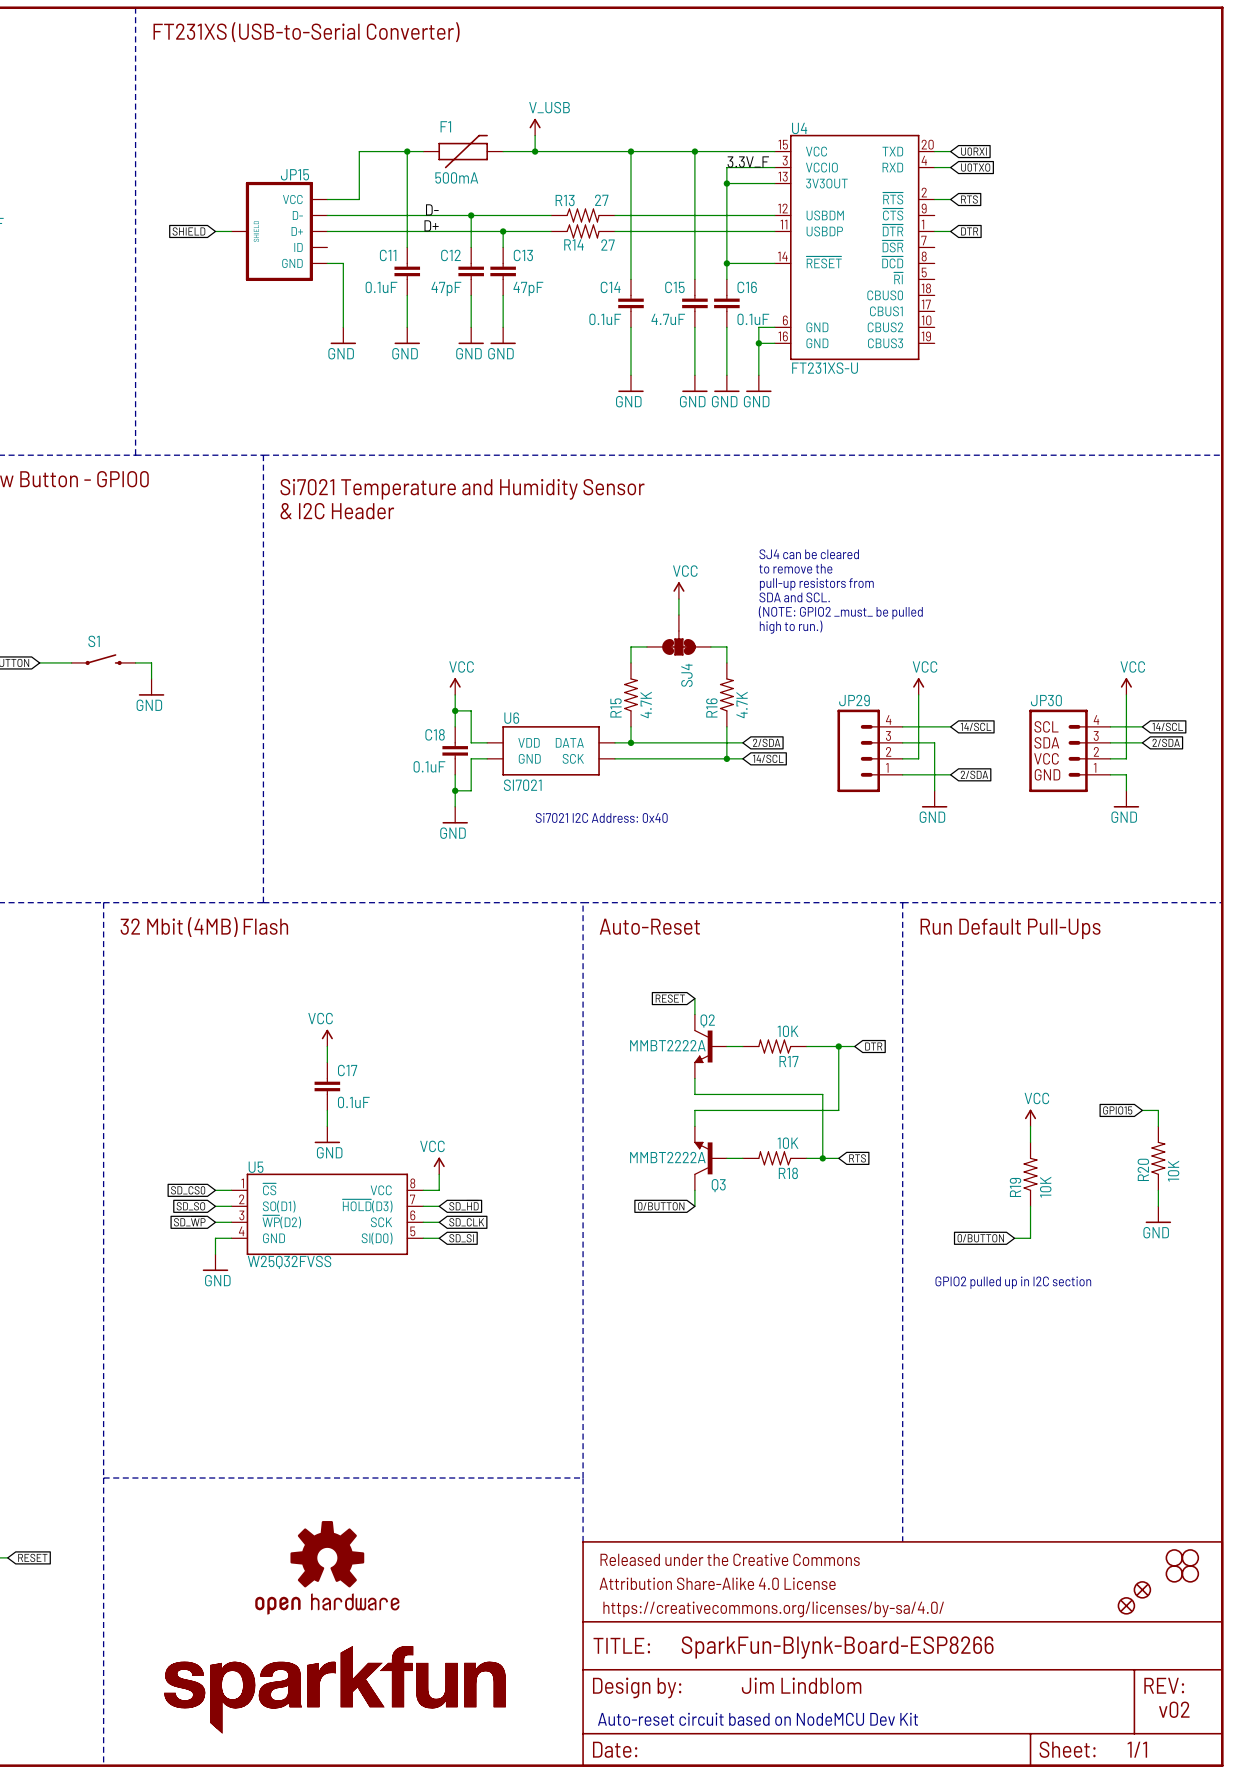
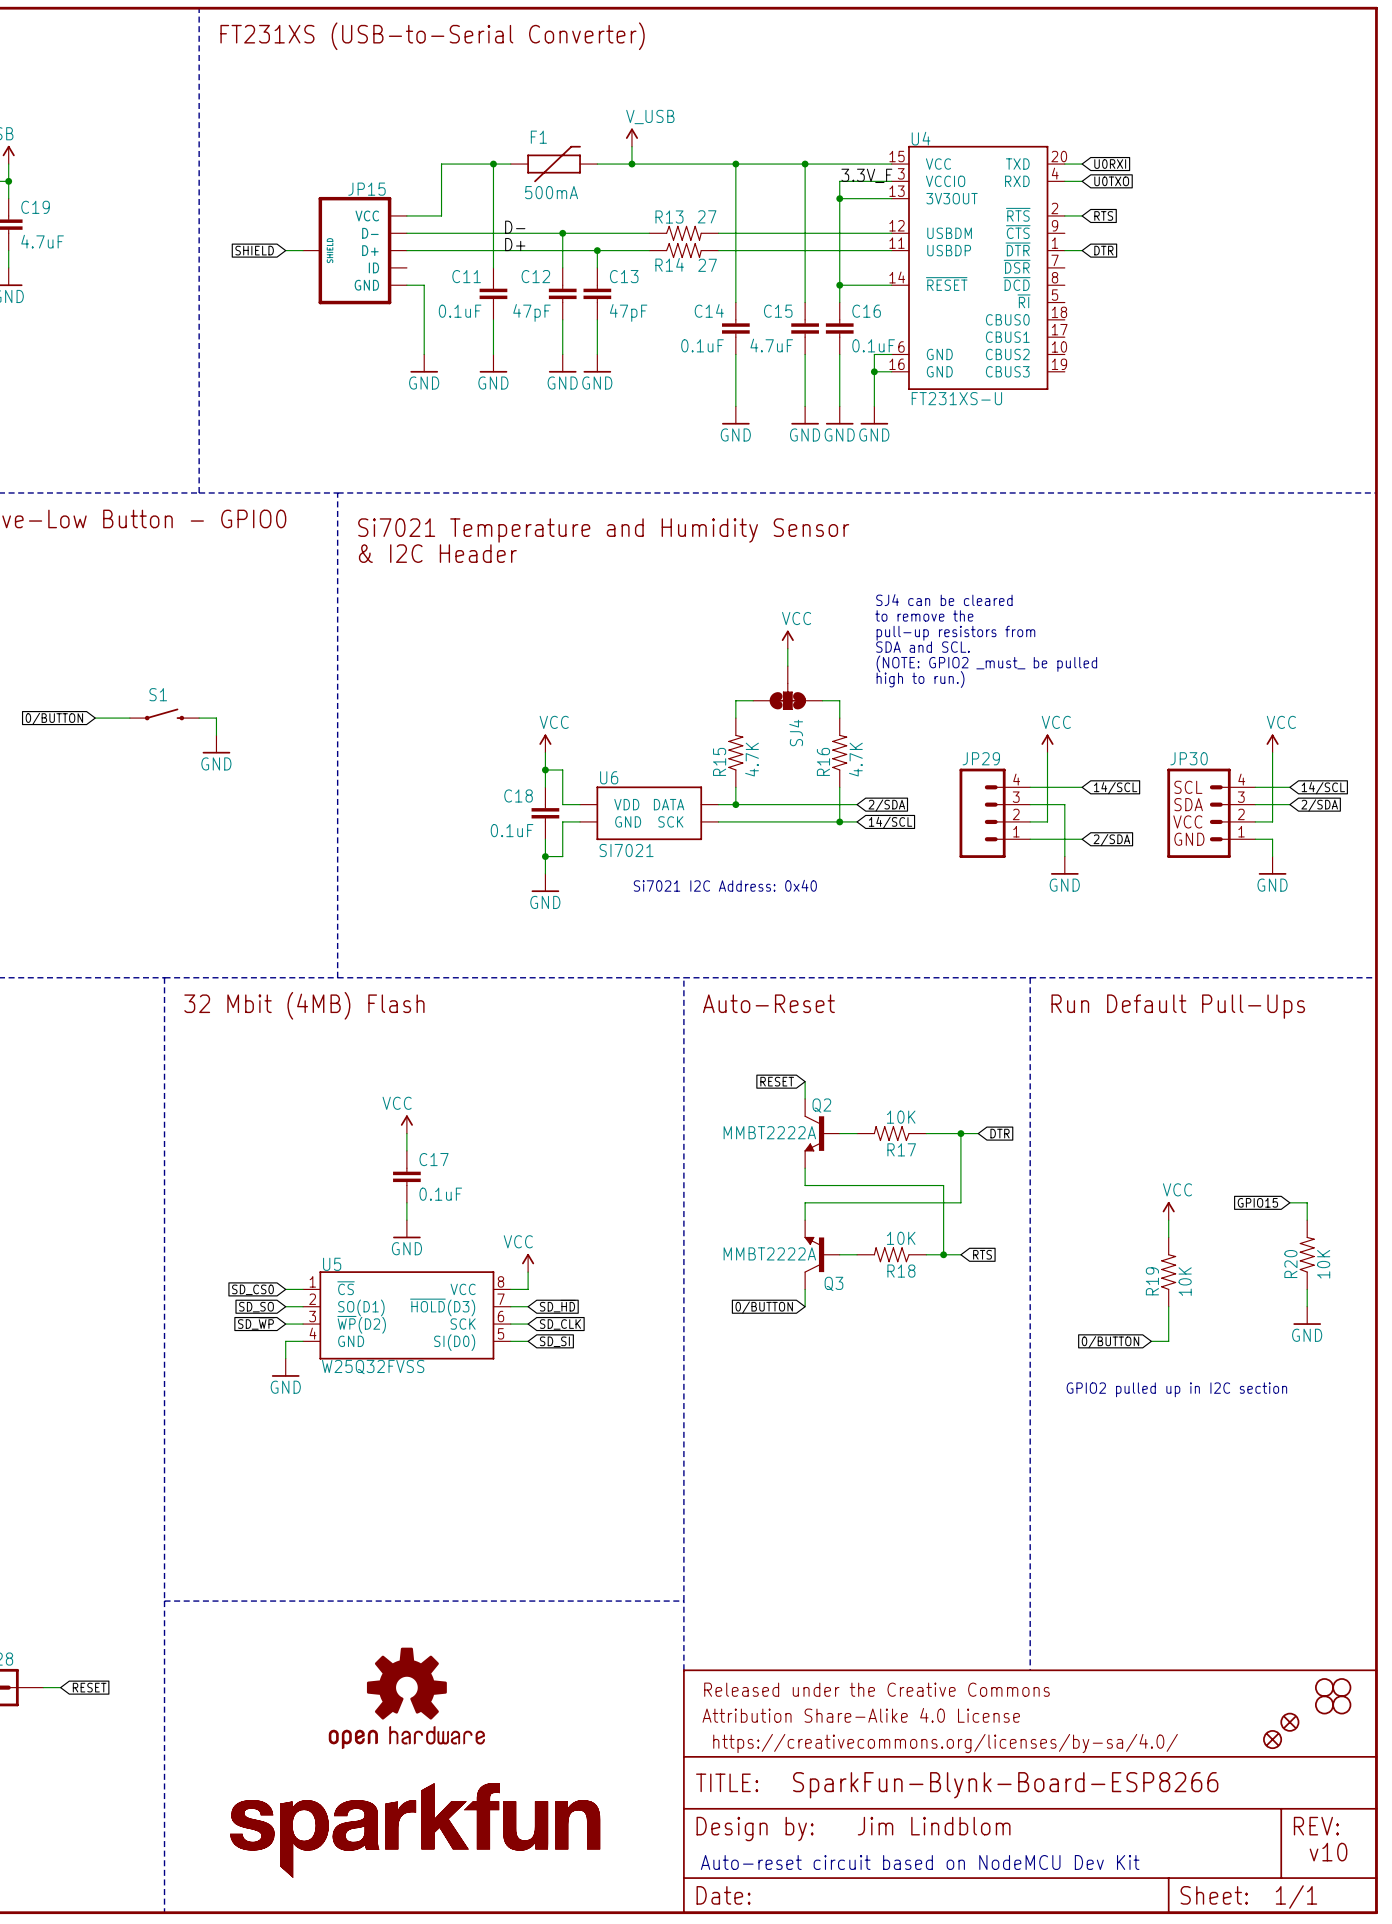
text: v02 (1174, 1709) -> v10 (1328, 1852)

